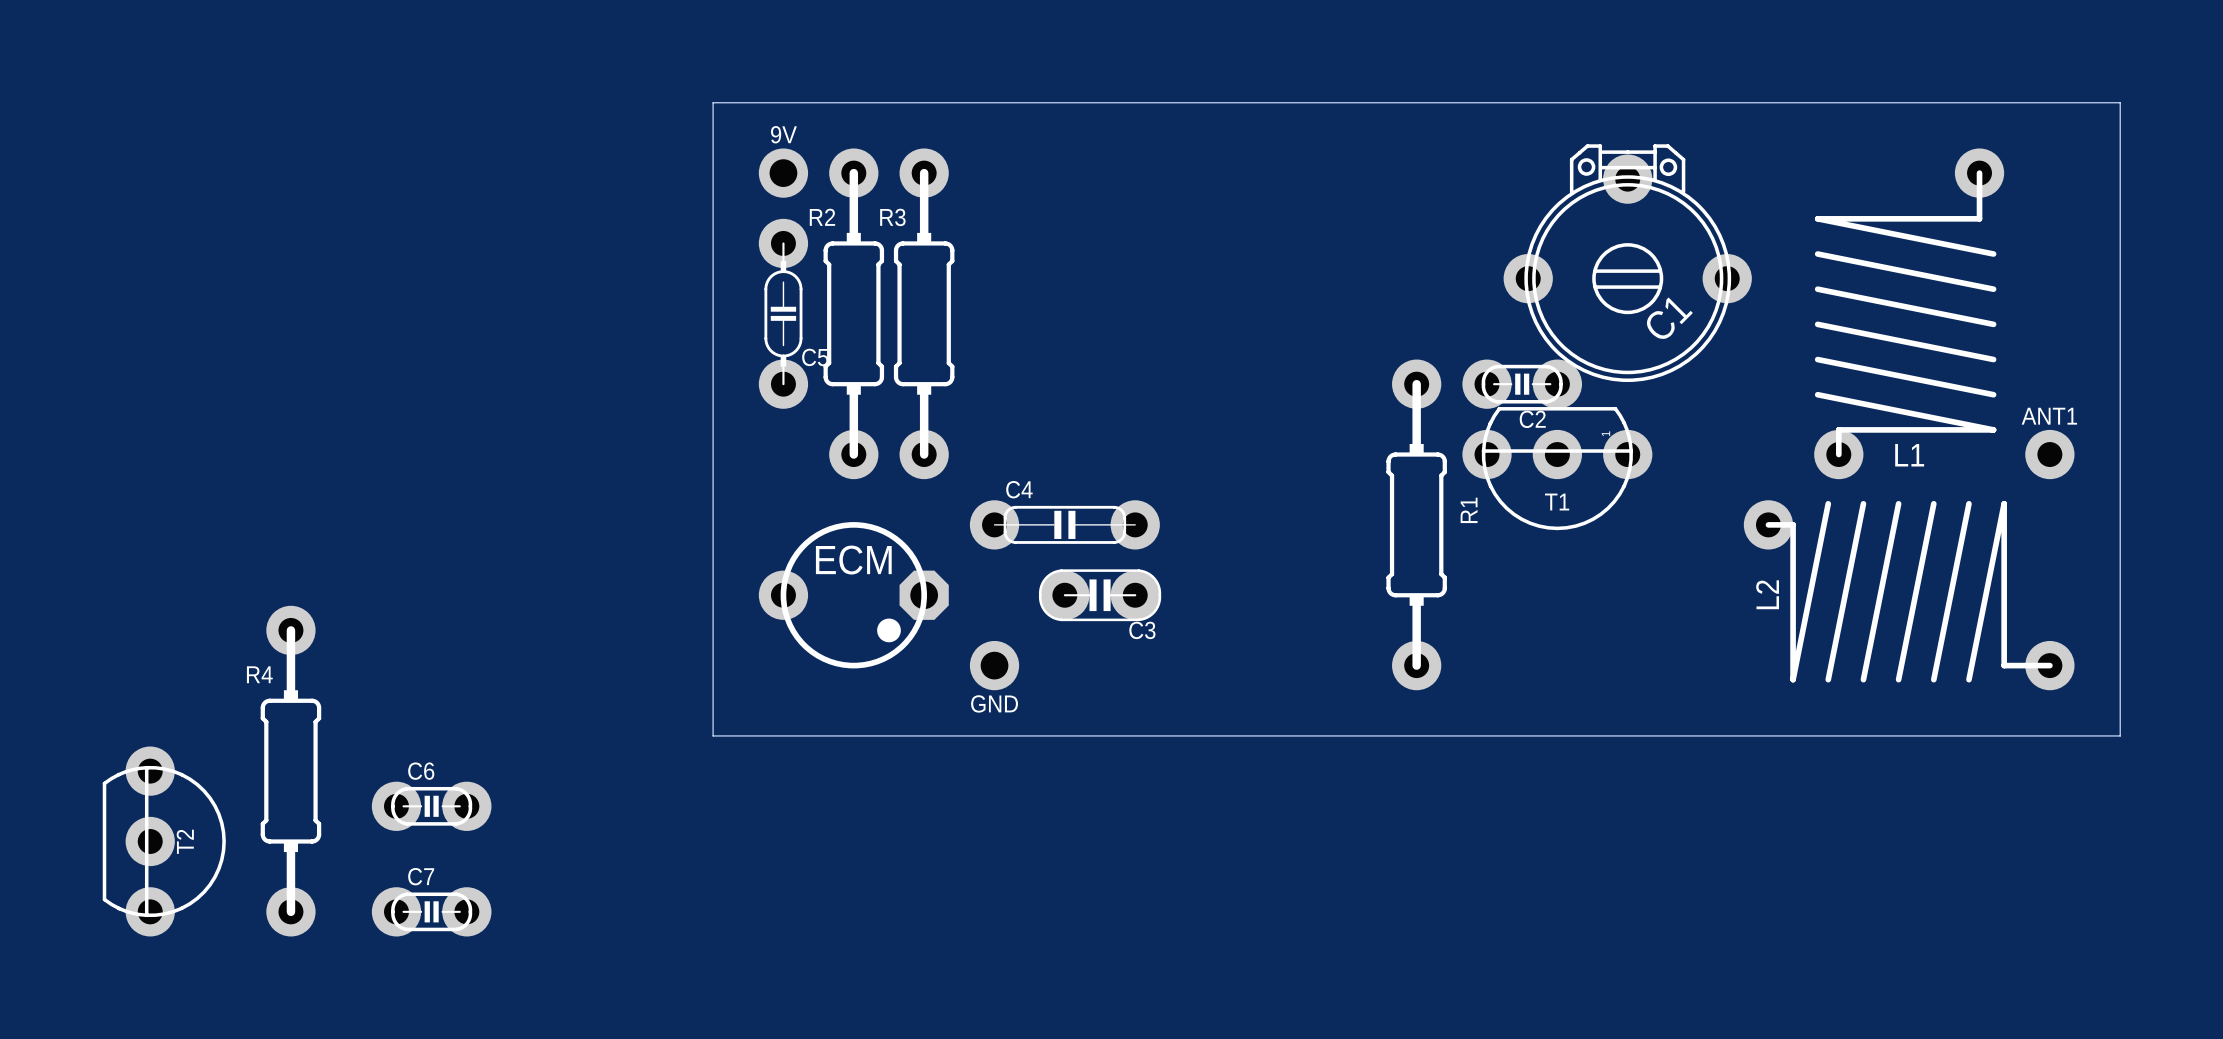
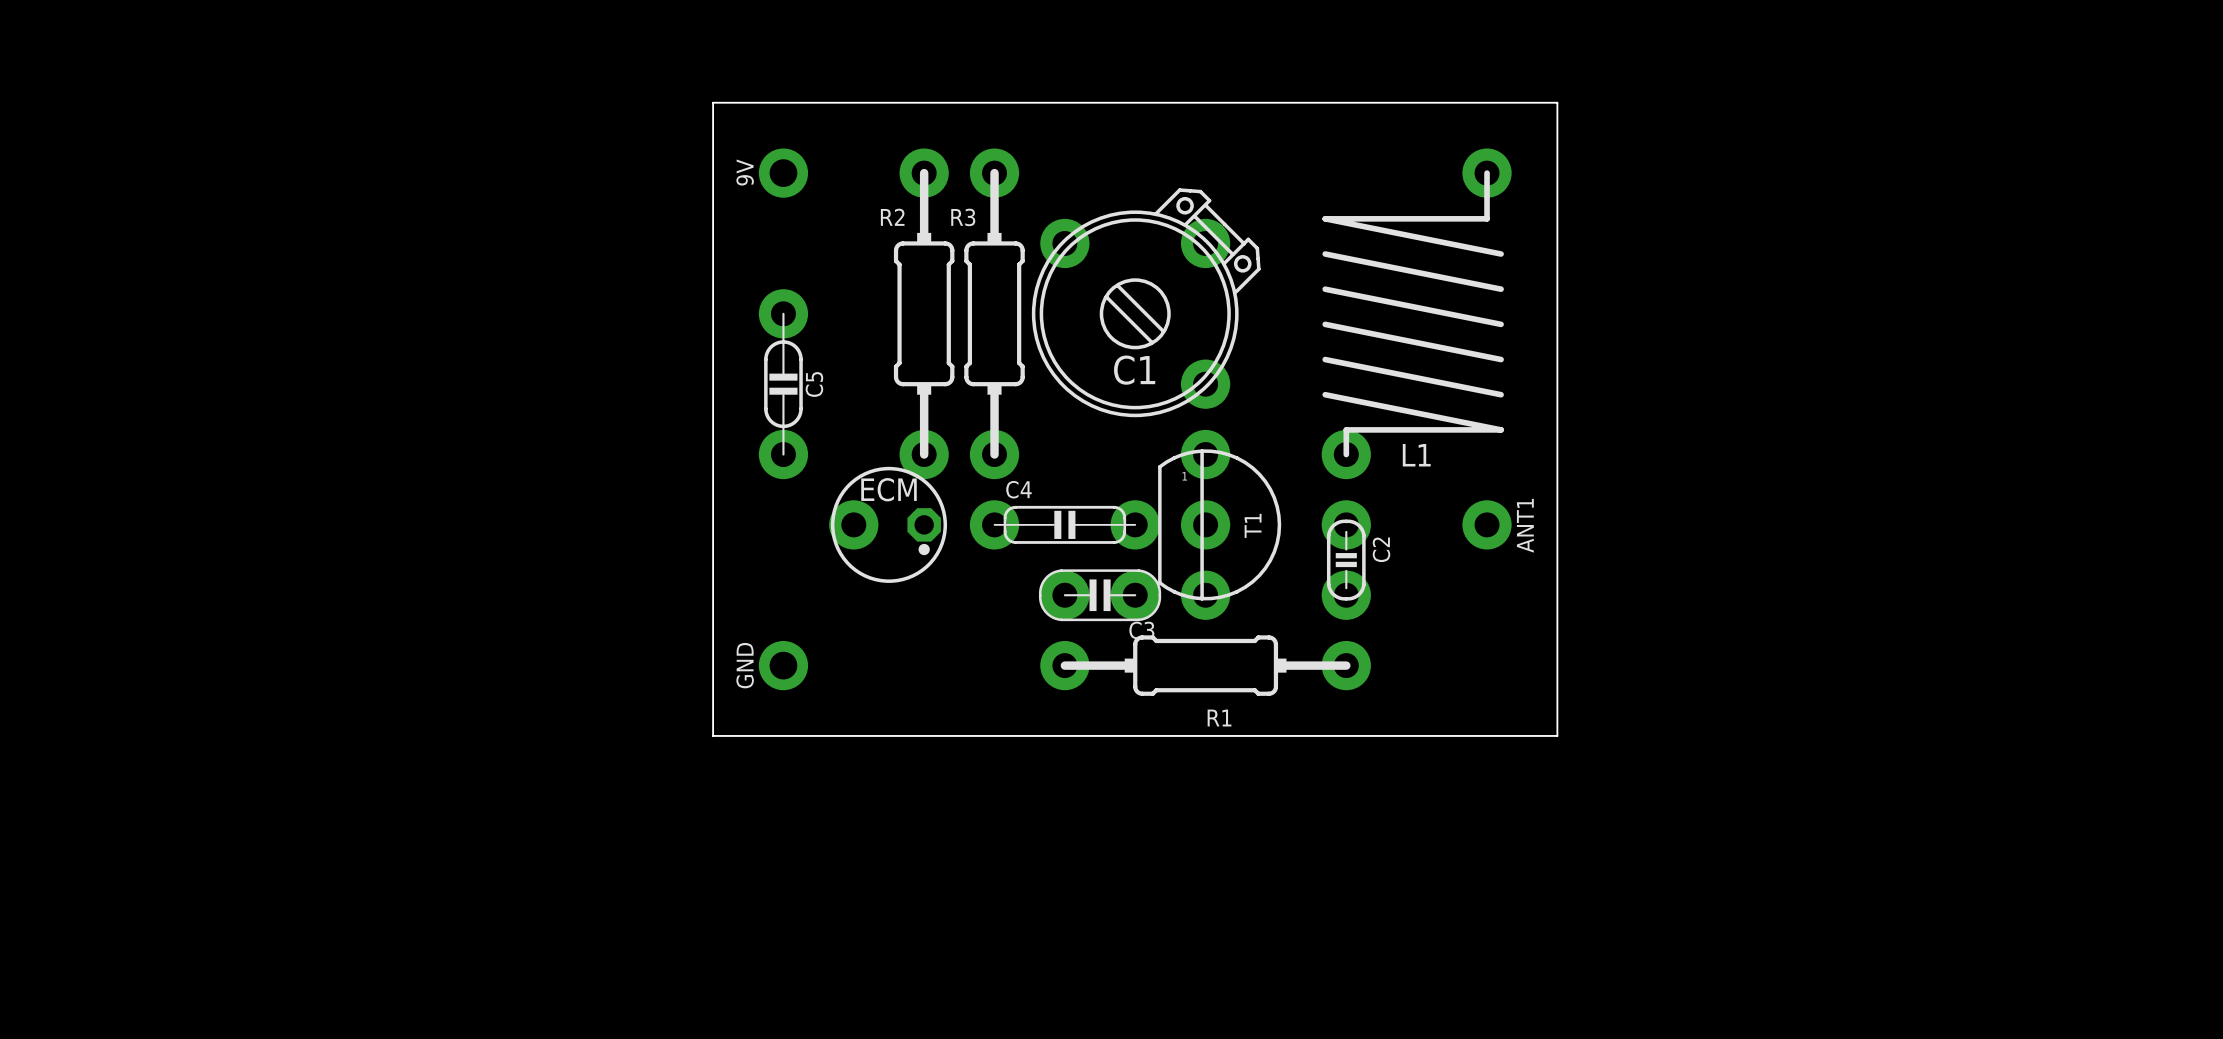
board edge: (1557, 102) (2120, 102) (2120, 735) (1557, 735) -> (1557, 102) (1557, 735)
9V name rotation: 0° (783, 134) -> 90° counterclockwise (745, 172)
9V name position: 9V (783, 134) -> 9V (745, 172)
R3 name: R3 (892, 217) -> R2 (892, 217)
C5 footprint: [758, 218, 809, 409] -> [758, 289, 809, 480]
C1 rotation: 0° (1627, 263) -> 45° clockwise (1146, 302)
C1 position: (1627, 263) -> (1146, 302)
R2: (853, 313) -> none
R3: none -> (994, 313)
L1 position: (1909, 313) -> (1416, 313)
C2 rotation: 0° (1522, 384) -> 90° clockwise (1346, 560)
C2 position: (1522, 384) -> (1346, 560)
T1 footprint: [1462, 407, 1653, 531] -> [1158, 429, 1282, 620]
ANT1 name rotation: 0° (2049, 416) -> 90° counterclockwise (1525, 525)
ANT1 position: (2049, 454) -> (1487, 524)
ECM: none -> (888, 524)
R1 rotation: 0° (1416, 524) -> 90° clockwise (1205, 665)
R1 position: (1416, 524) -> (1205, 665)
ECM: (853, 595) -> none
L2: (1909, 595) -> none
GND position: (994, 665) -> (783, 665)
GND name rotation: 0° (994, 703) -> 90° counterclockwise (745, 665)
R4: (290, 771) -> none
C6: (431, 806) -> none
T2: (164, 841) -> none
C7: (431, 911) -> none

